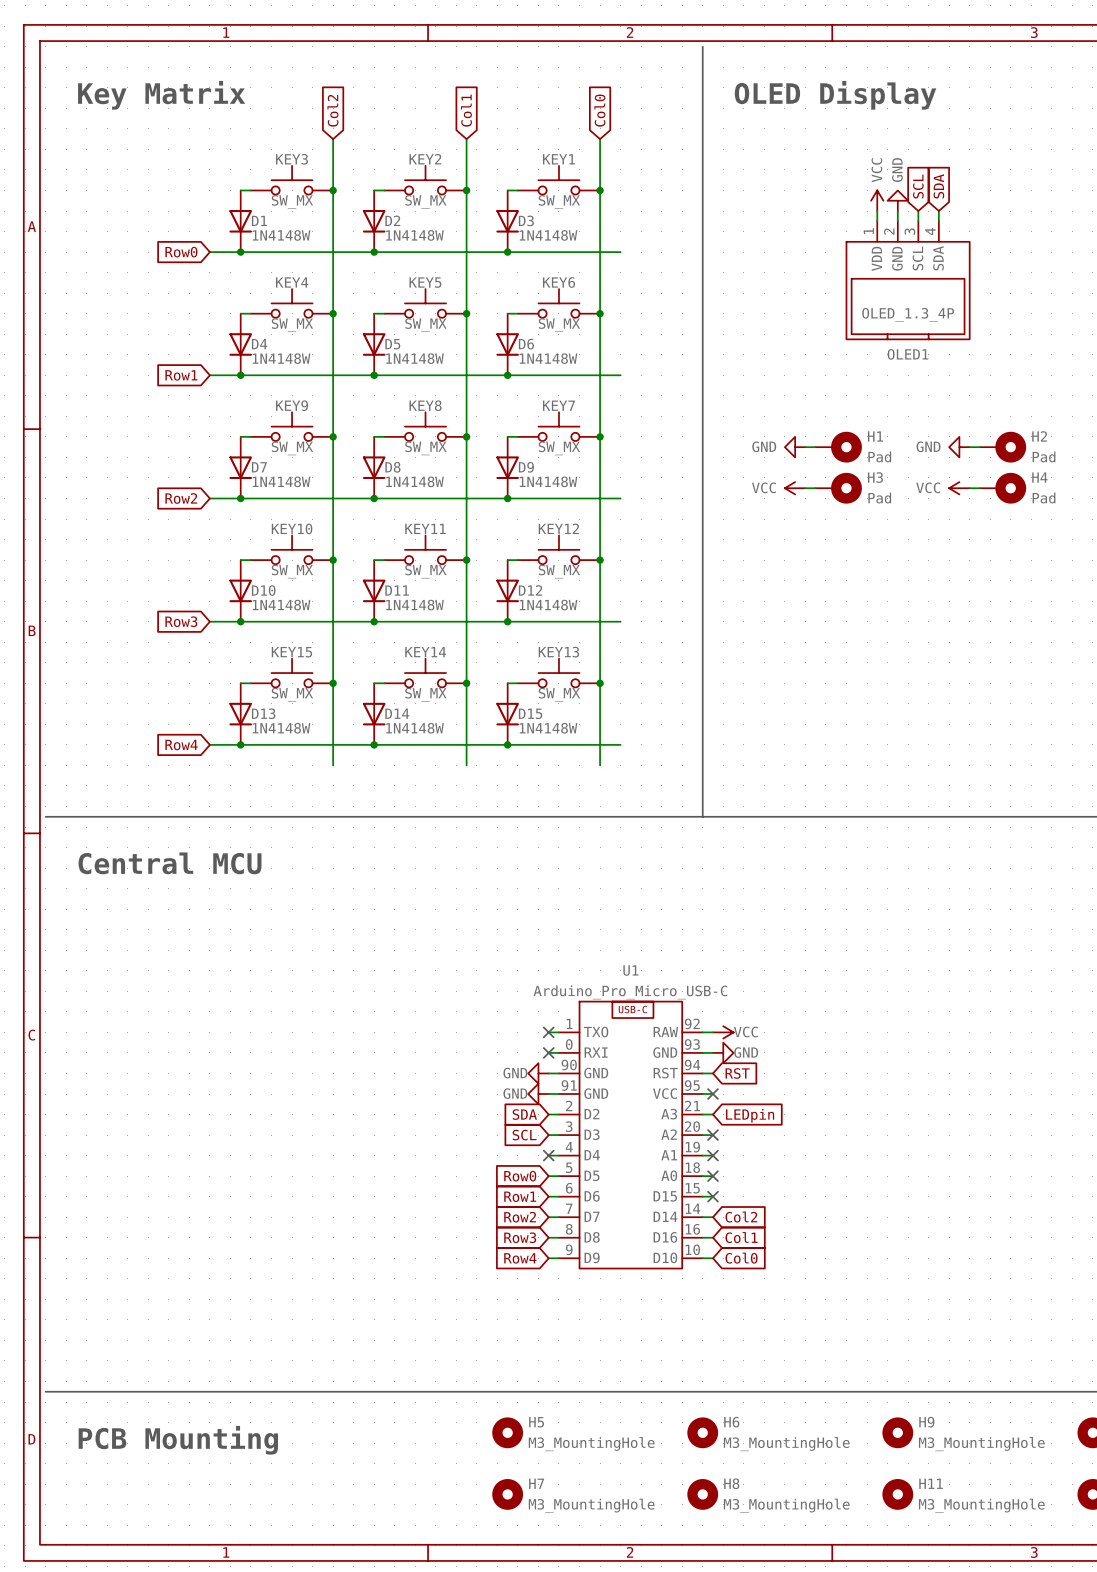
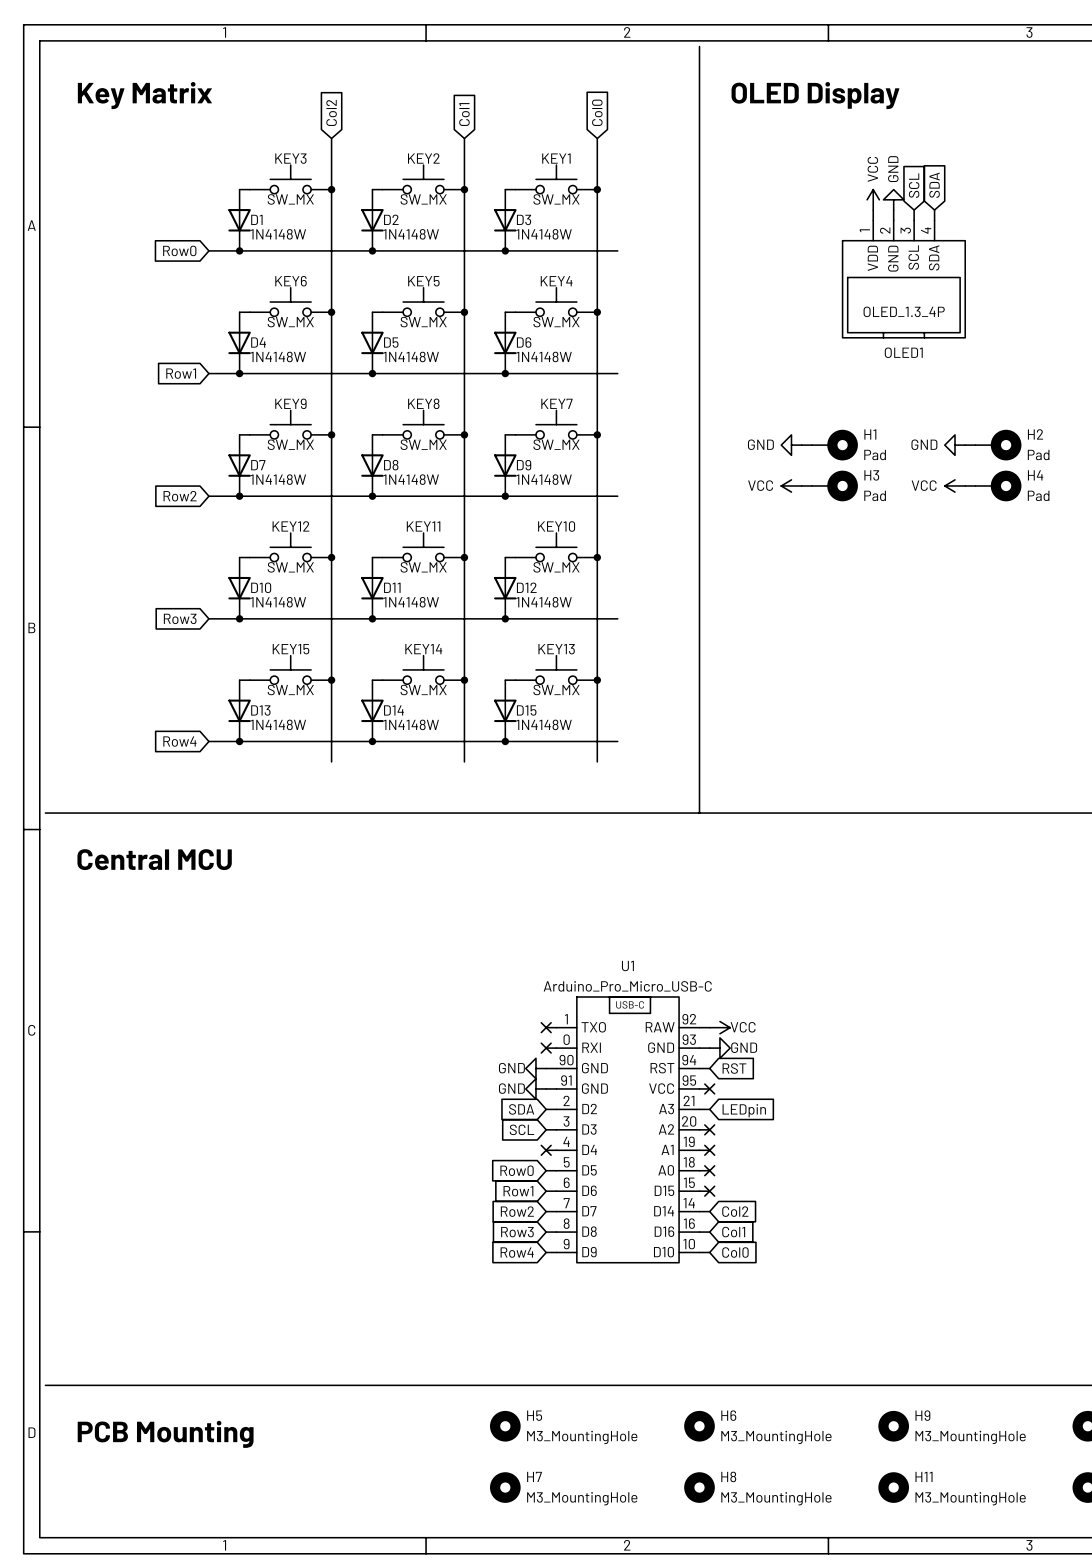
KEY4 name: KEY4 (292, 282) -> KEY6 (291, 281)
KEY6 name: KEY6 (559, 282) -> KEY4 (556, 281)
KEY10 name: KEY10 (292, 528) -> KEY12 (290, 526)
KEY12 name: KEY12 (558, 528) -> KEY10 (556, 526)

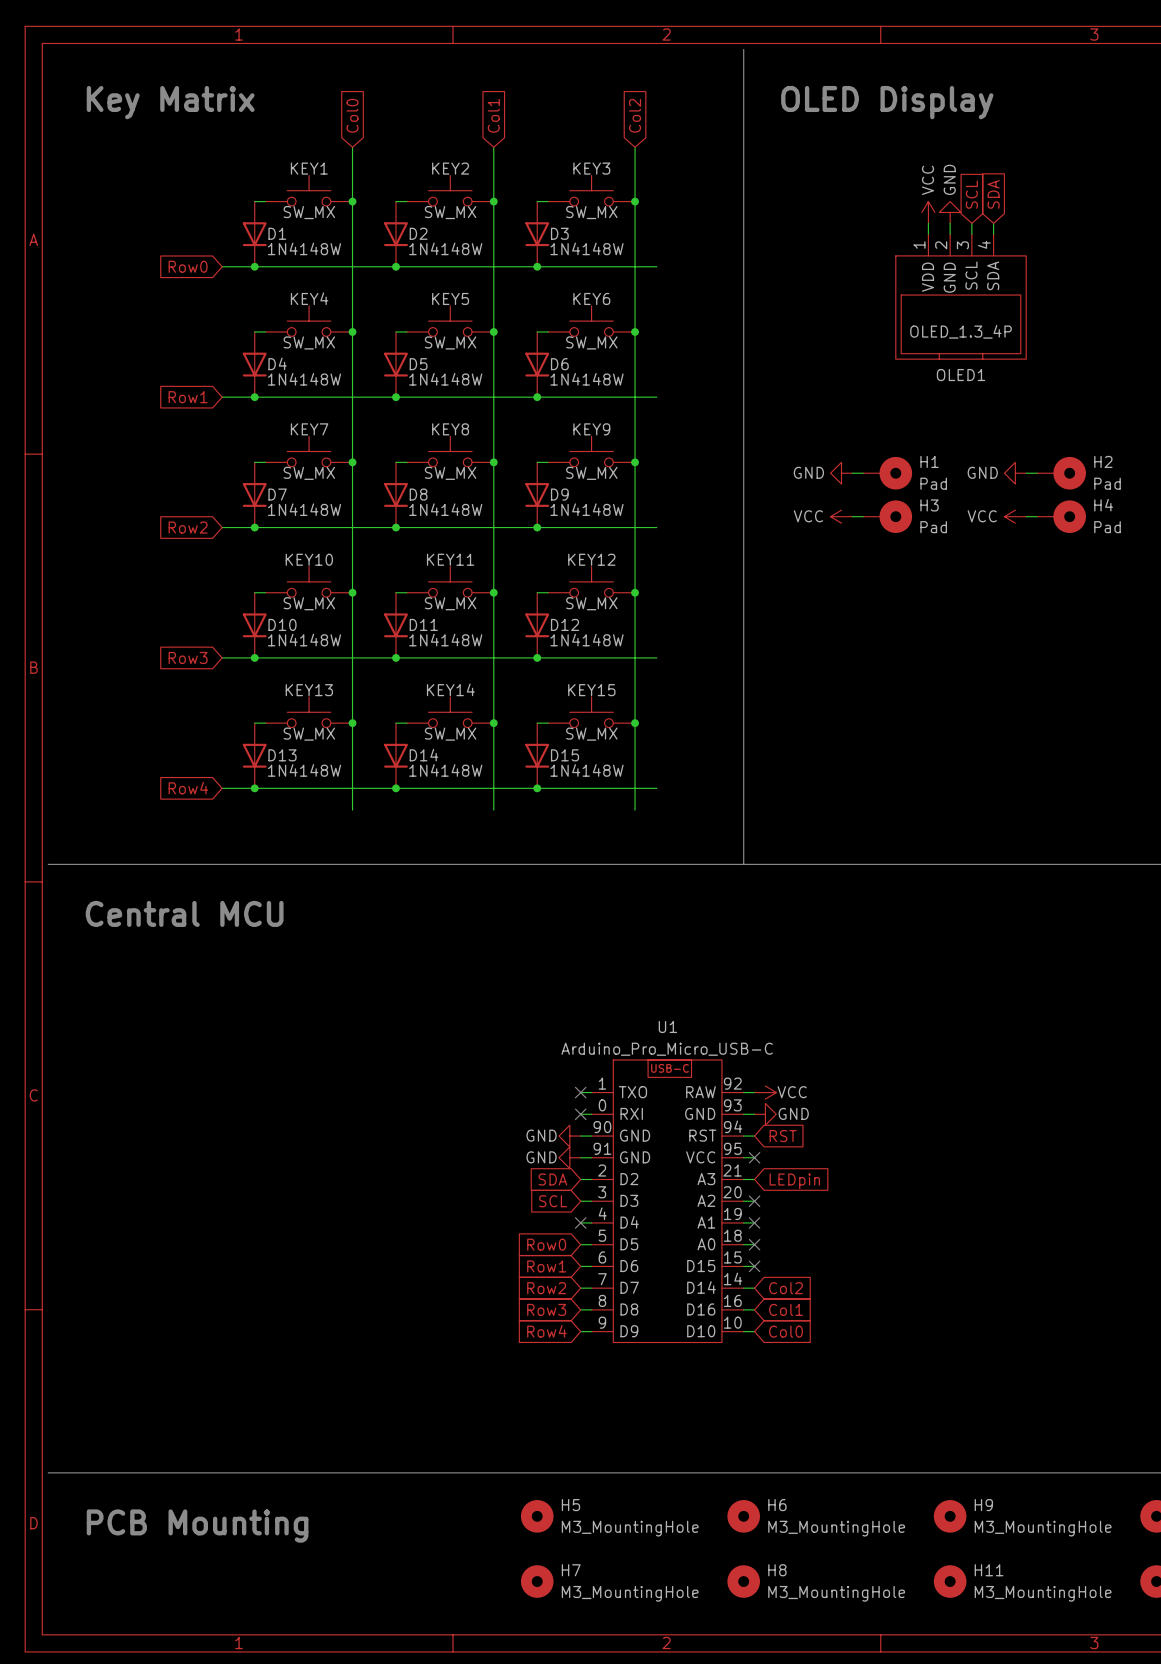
global label: Col2 (331, 112) -> Col0 (352, 115)
global label: Col0 (597, 112) -> Col2 (635, 115)
KEY3 name: KEY3 (290, 158) -> KEY1 (309, 168)
KEY1 name: KEY1 (556, 158) -> KEY3 (591, 168)
KEY6 name: KEY6 (291, 281) -> KEY4 (309, 298)
KEY4 name: KEY4 (556, 281) -> KEY6 (591, 298)
KEY9 name: KEY9 (290, 403) -> KEY7 (309, 429)
KEY7 name: KEY7 (556, 403) -> KEY9 (591, 429)
KEY12 name: KEY12 (290, 526) -> KEY10 (309, 559)
KEY10 name: KEY10 (556, 526) -> KEY12 (591, 559)
KEY15 name: KEY15 (291, 649) -> KEY13 (309, 690)
KEY13 name: KEY13 (556, 649) -> KEY15 (591, 690)

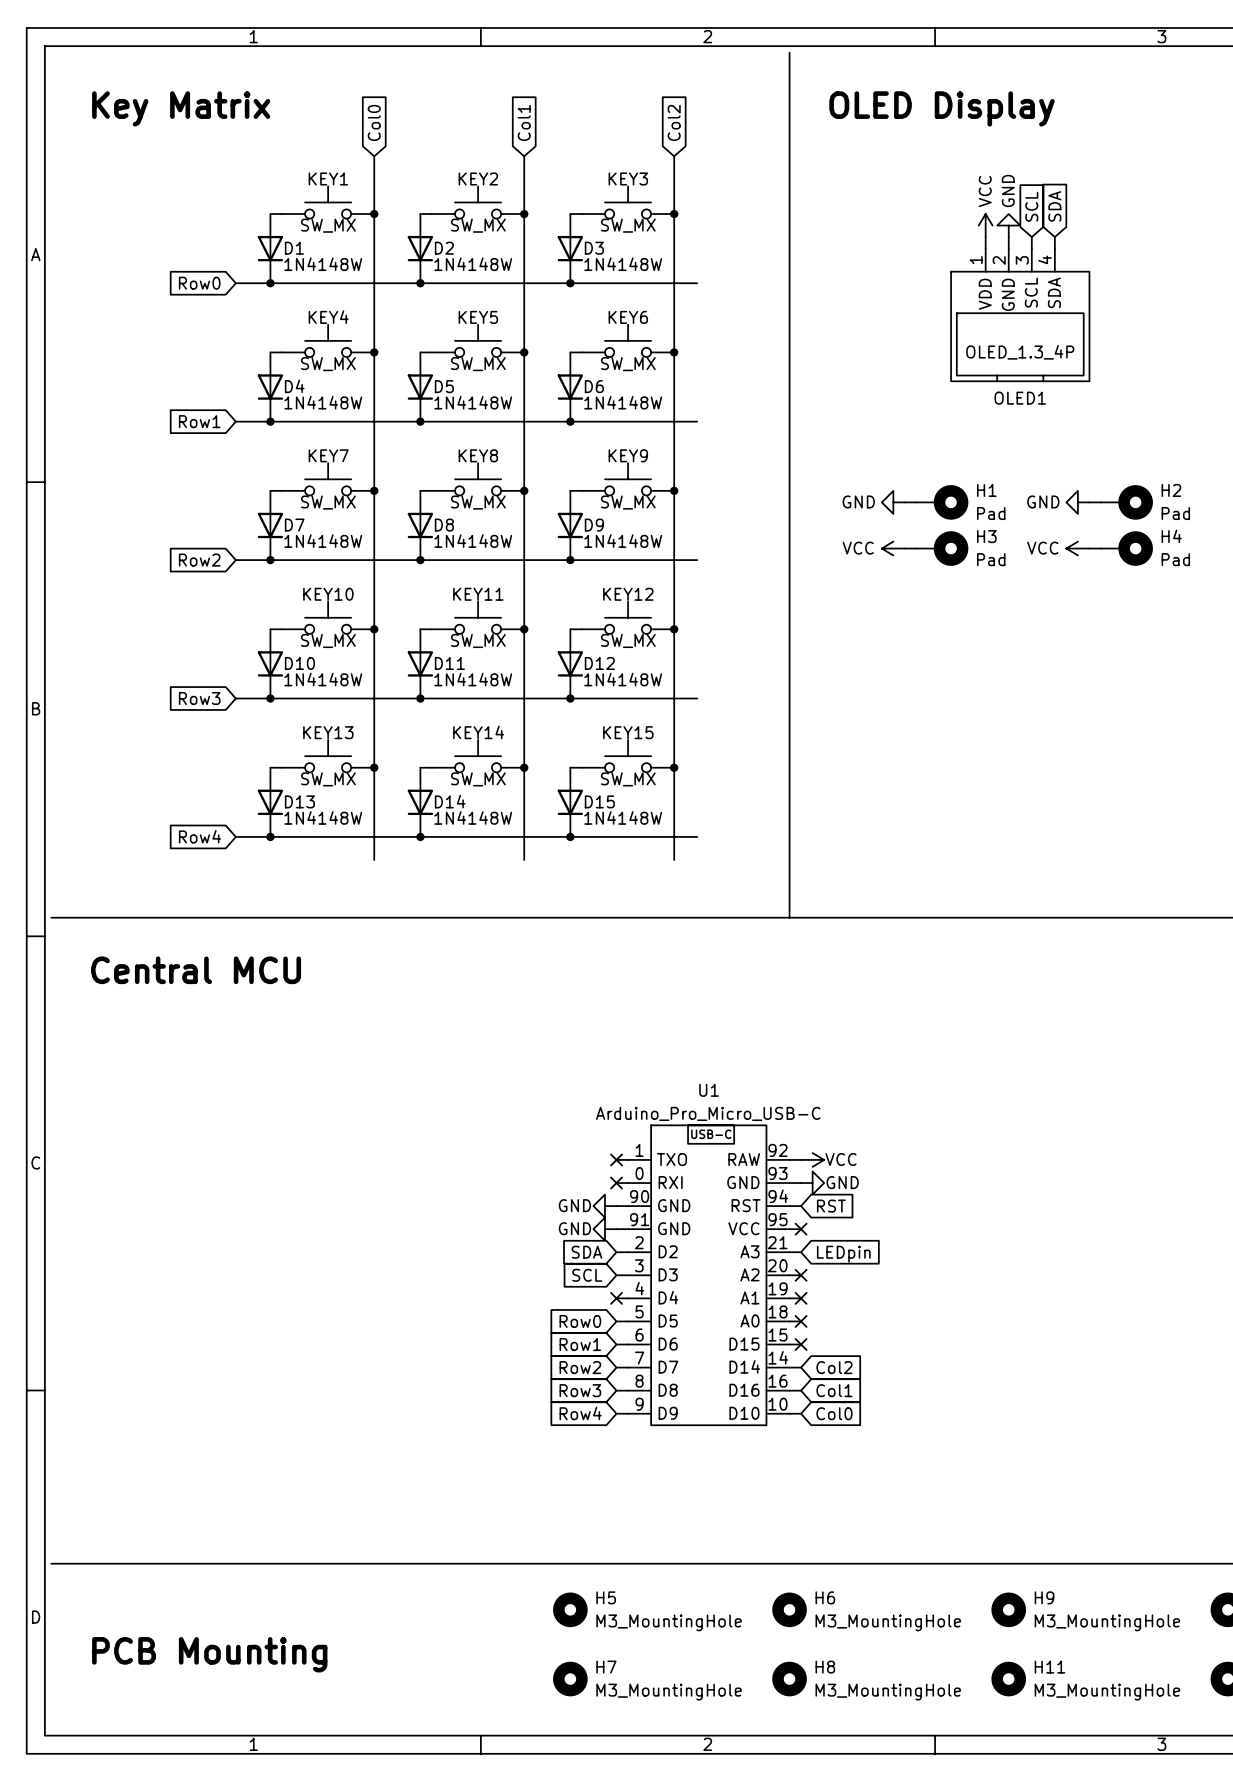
text position: PCB Mounting (197, 1526) -> PCB Mounting (209, 1654)

